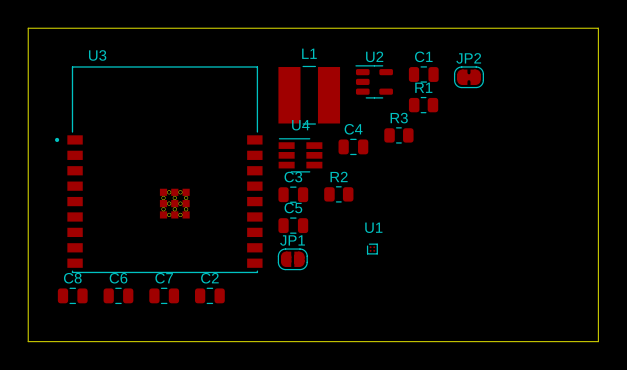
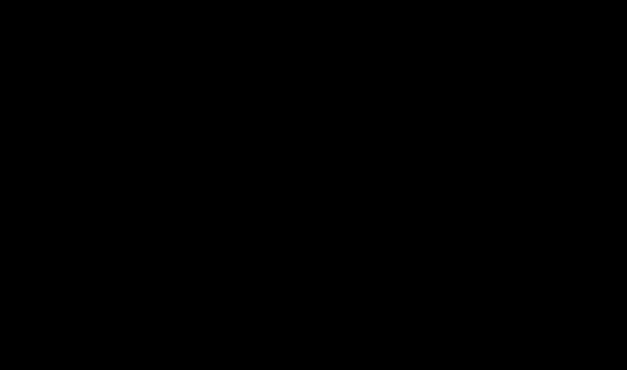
board edge: (28, 28) (28, 341) (598, 341) (598, 28) (28, 28) -> none
C1: (423, 74) -> none
JP2: (468, 77) -> none
U2: (374, 81) -> none
L1: (309, 95) -> none
R1: (423, 105) -> none
R3: (398, 135) -> none
C4: (353, 146) -> none
U4: (300, 155) -> none
U3: (158, 169) -> none
C3: (293, 194) -> none
R2: (338, 194) -> none
C5: (293, 225) -> none
U1: (372, 249) -> none
JP1: (292, 259) -> none
C8: (72, 295) -> none
C6: (118, 295) -> none
C7: (164, 295) -> none
C2: (209, 295) -> none

